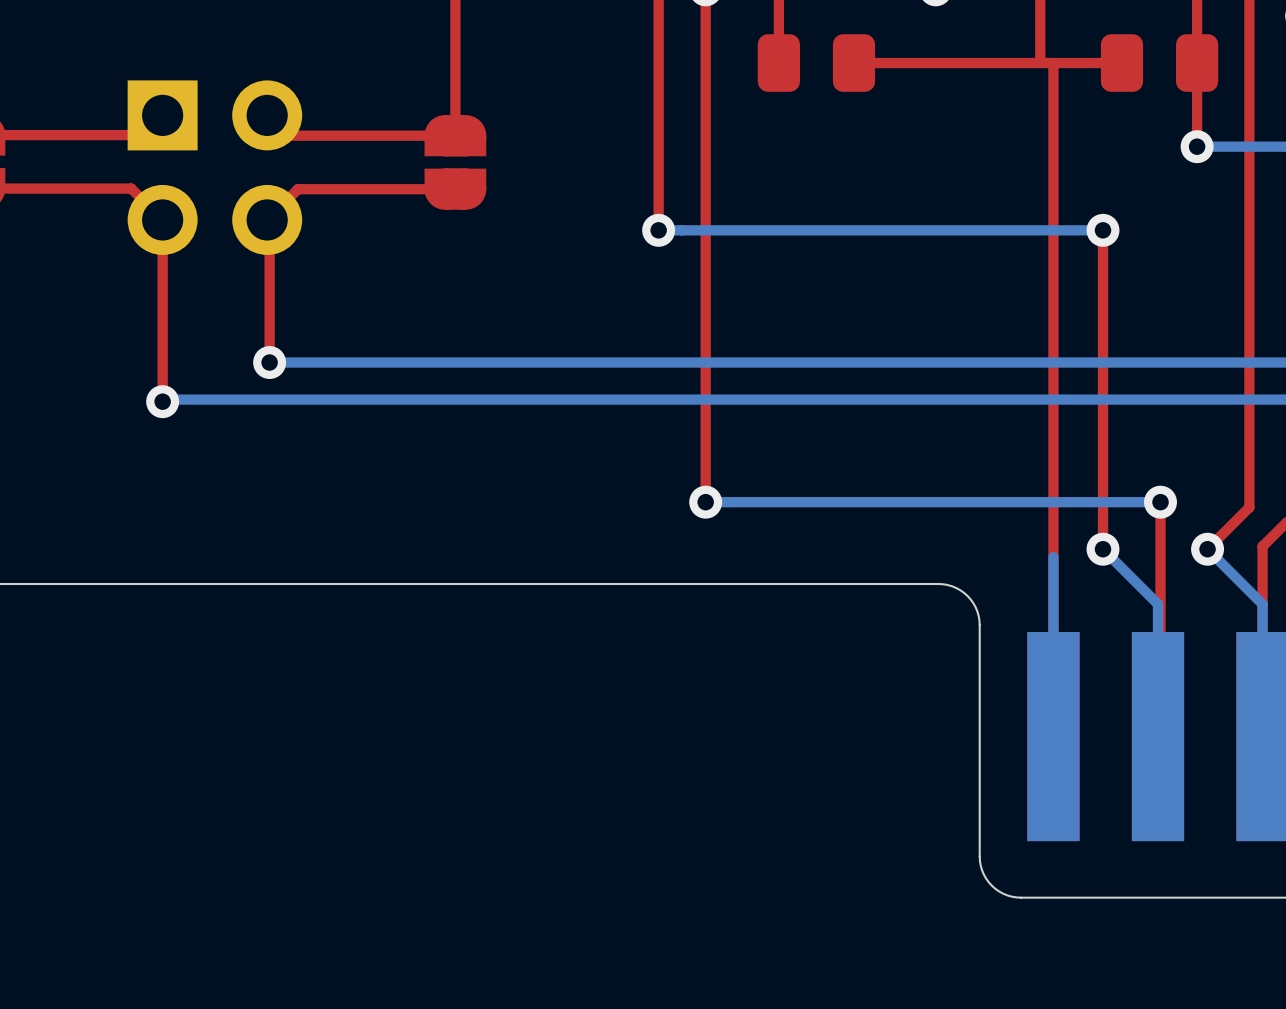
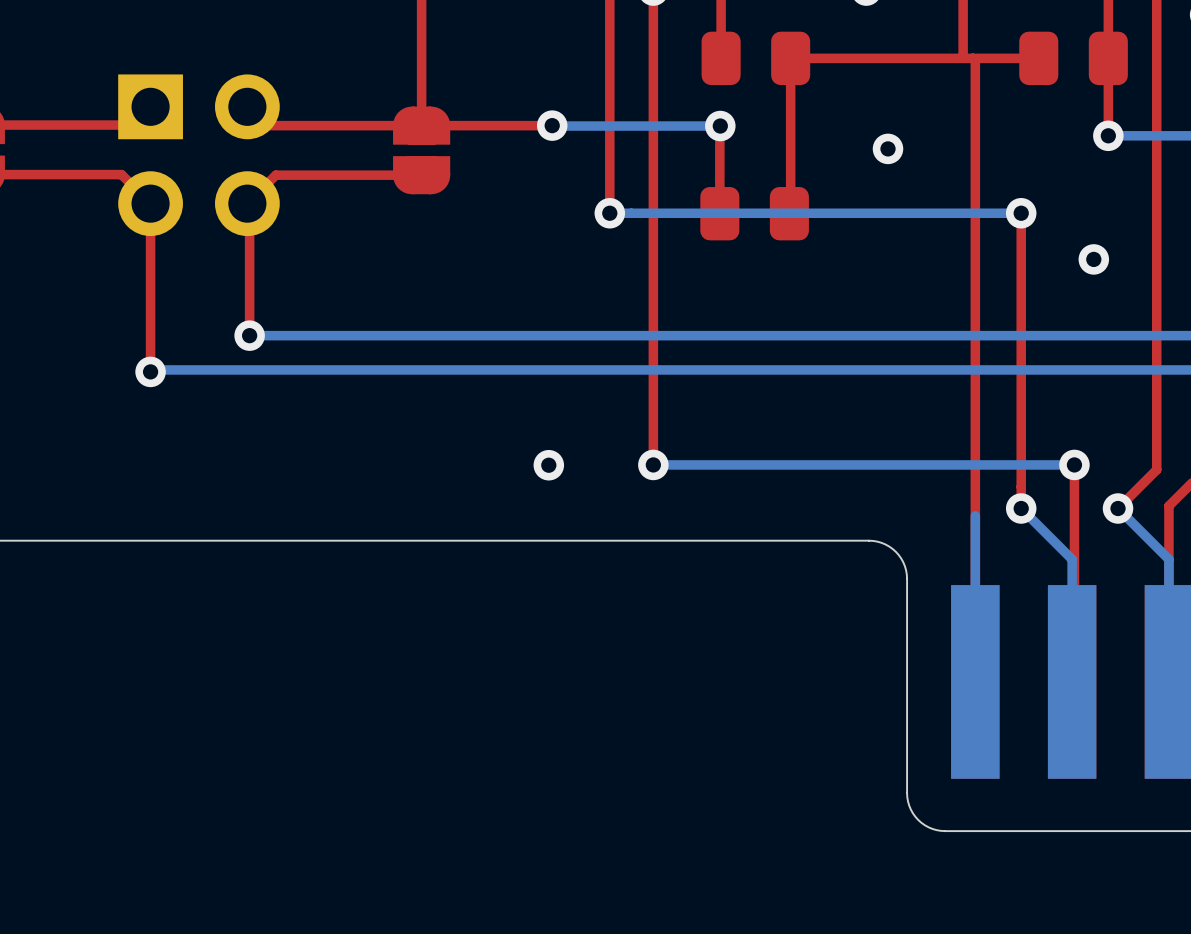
top track: none -> (790, 58) (789, 213)
top track: none -> (552, 125) (421, 125)
via: none -> (552, 125)
top track: none -> (719, 126) (719, 213)
bottom track: none -> (720, 126) (552, 126)
via: none -> (720, 126)
via: none -> (888, 148)
part: none -> (754, 213)
via: none -> (1093, 259)
via: none -> (548, 465)

